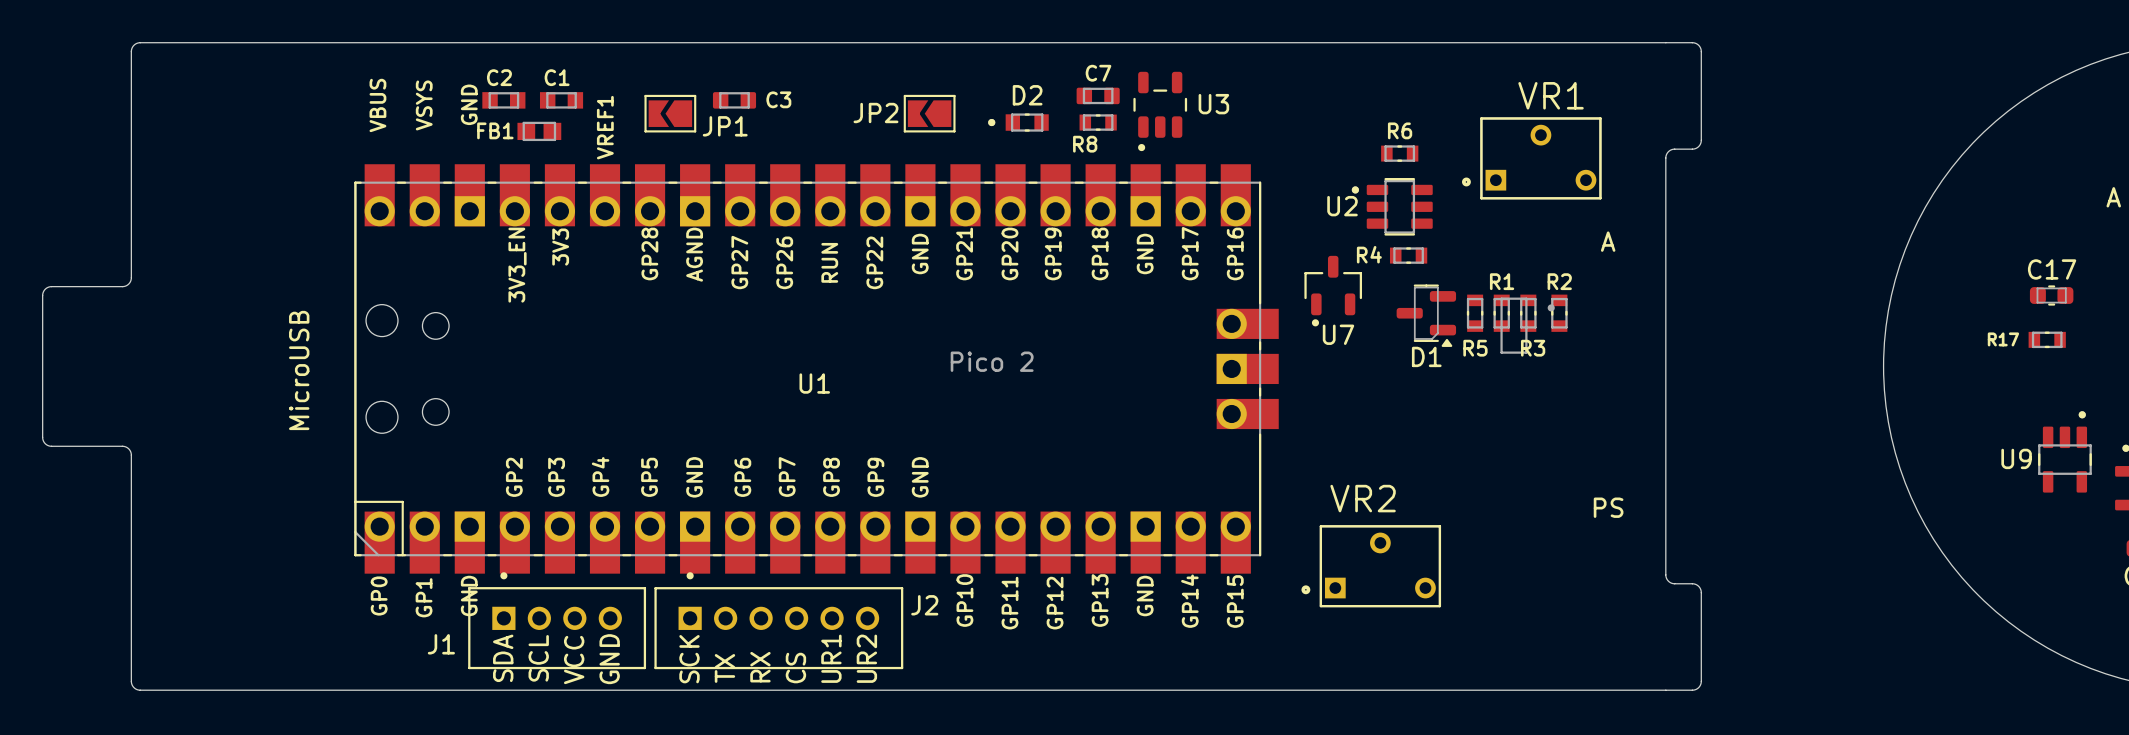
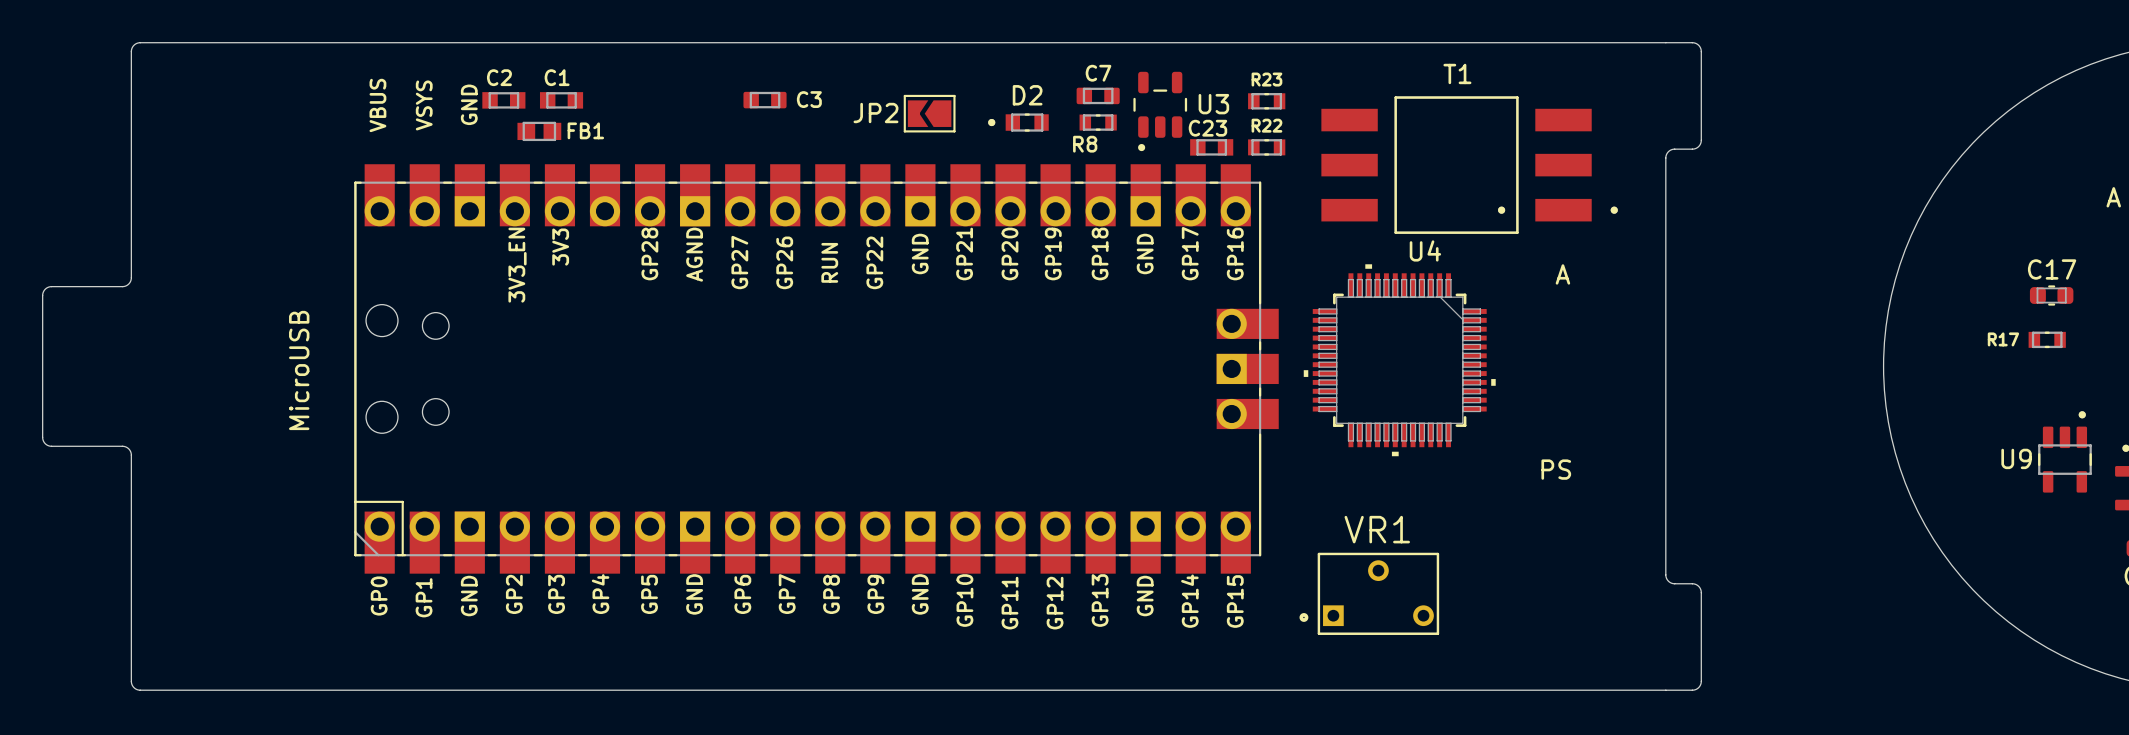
VR1 name position: VR1 (1551, 95) -> VR1 (1377, 529)
C3 position: (734, 100) -> (765, 100)
R23: none -> (1266, 101)
JP1: (670, 113) -> none
text: VREF1 (605, 127) -> none
FB1 name position: FB1 (495, 130) -> FB1 (585, 130)
C23: none -> (1211, 147)
R22: none -> (1266, 147)
R6: (1399, 153) -> none
VR1 position: (1531, 158) -> (1369, 593)
U1 footprint: [354, 164, 1279, 574] -> [354, 164, 1279, 574]
T1: none -> (1469, 165)
U2: (1392, 206) -> none
text position: A (1608, 241) -> A (1562, 274)
R4: (1408, 255) -> none
U7: (1333, 291) -> none
R5: (1475, 313) -> none
R1: (1501, 313) -> none
R3: (1528, 313) -> none
R2: (1559, 313) -> none
D1: (1426, 315) -> none
part: (1527, 325) -> none
U4: none -> (1399, 360)
U1 value: Pico 2 (992, 361) -> none
U1 name: U1 (814, 383) -> none
text position: PS (1608, 507) -> PS (1556, 469)
VR2: (1371, 566) -> none
J1: (557, 620) -> none
J2: (778, 620) -> none
text: SDA (503, 658) -> none
text: SCL (538, 658) -> none
text: UR1 (831, 658) -> none
text: UR2 (866, 658) -> none
text: GND (609, 659) -> none
text: SCK (689, 659) -> none
text: VCC (574, 660) -> none
text: RX (760, 667) -> none
text: TX (724, 668) -> none
text: CS (795, 668) -> none

